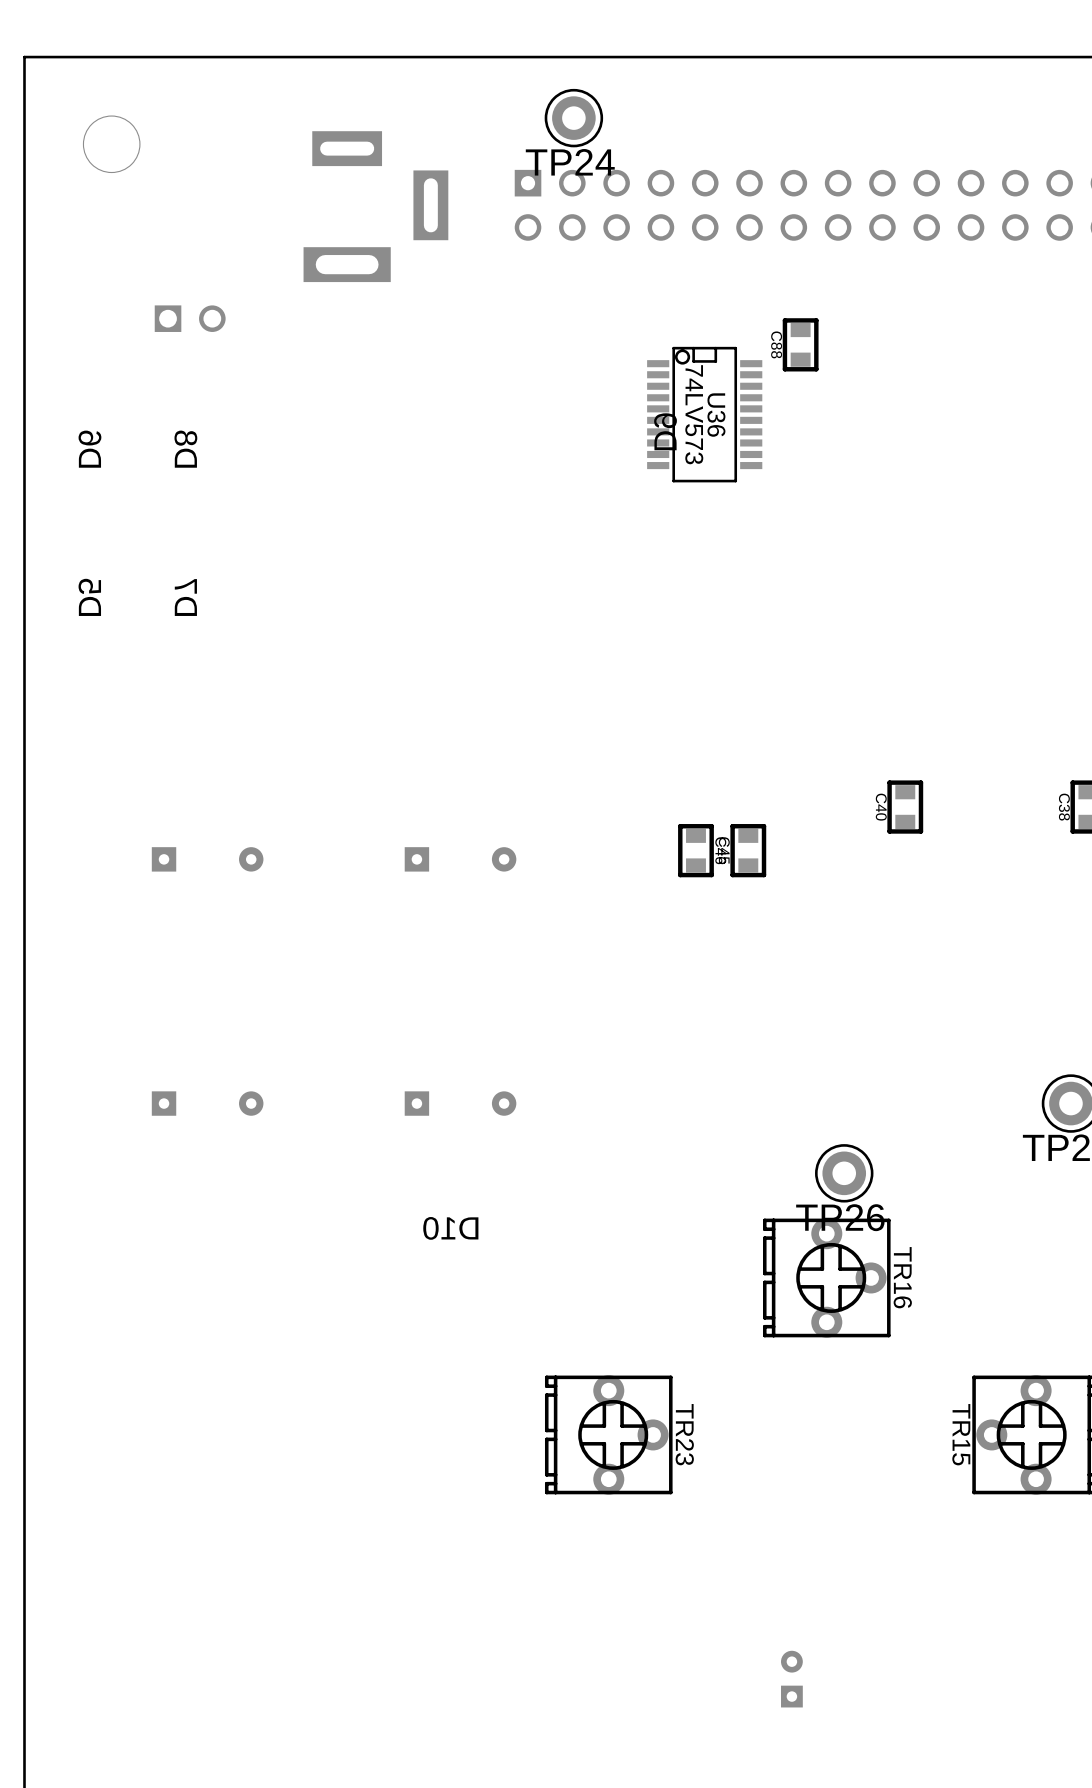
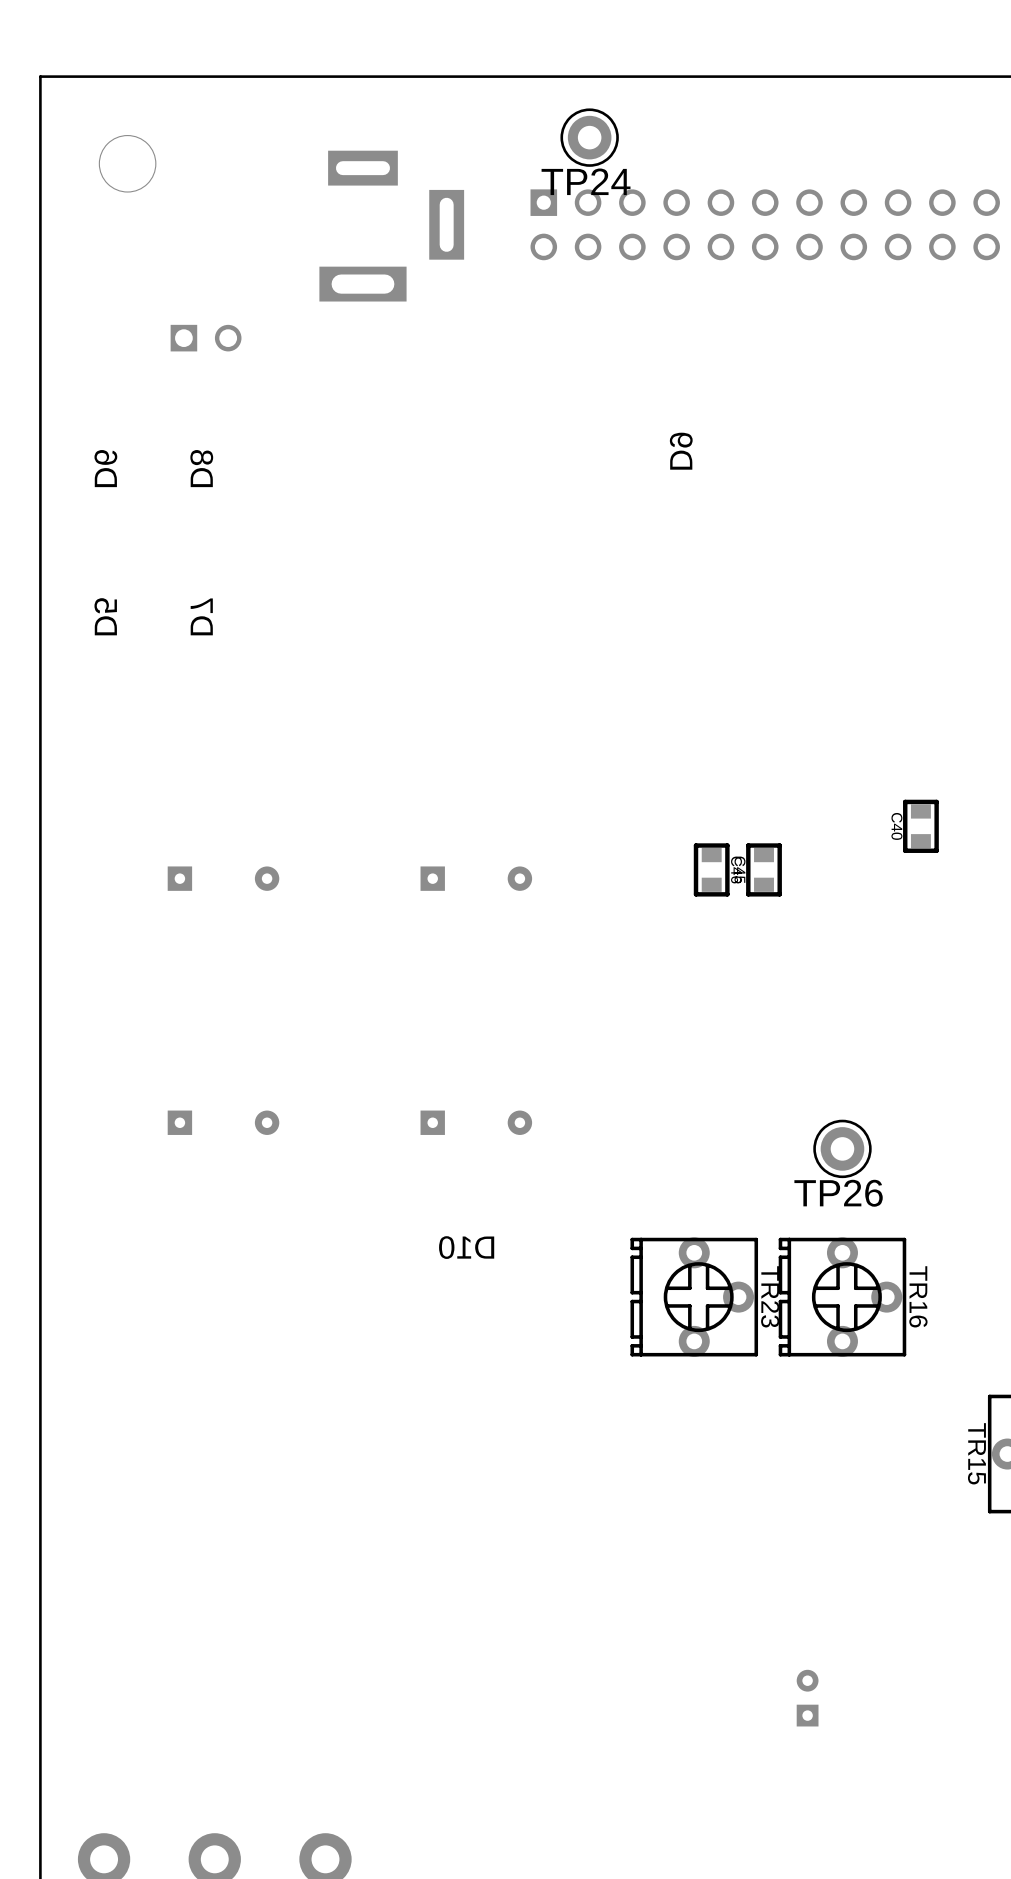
C88: (800, 344) -> none
U36: 74LV573 (704, 414) -> none
TP26 position: (844, 1173) -> (842, 1148)
TR23 position: (608, 1434) -> (694, 1297)

